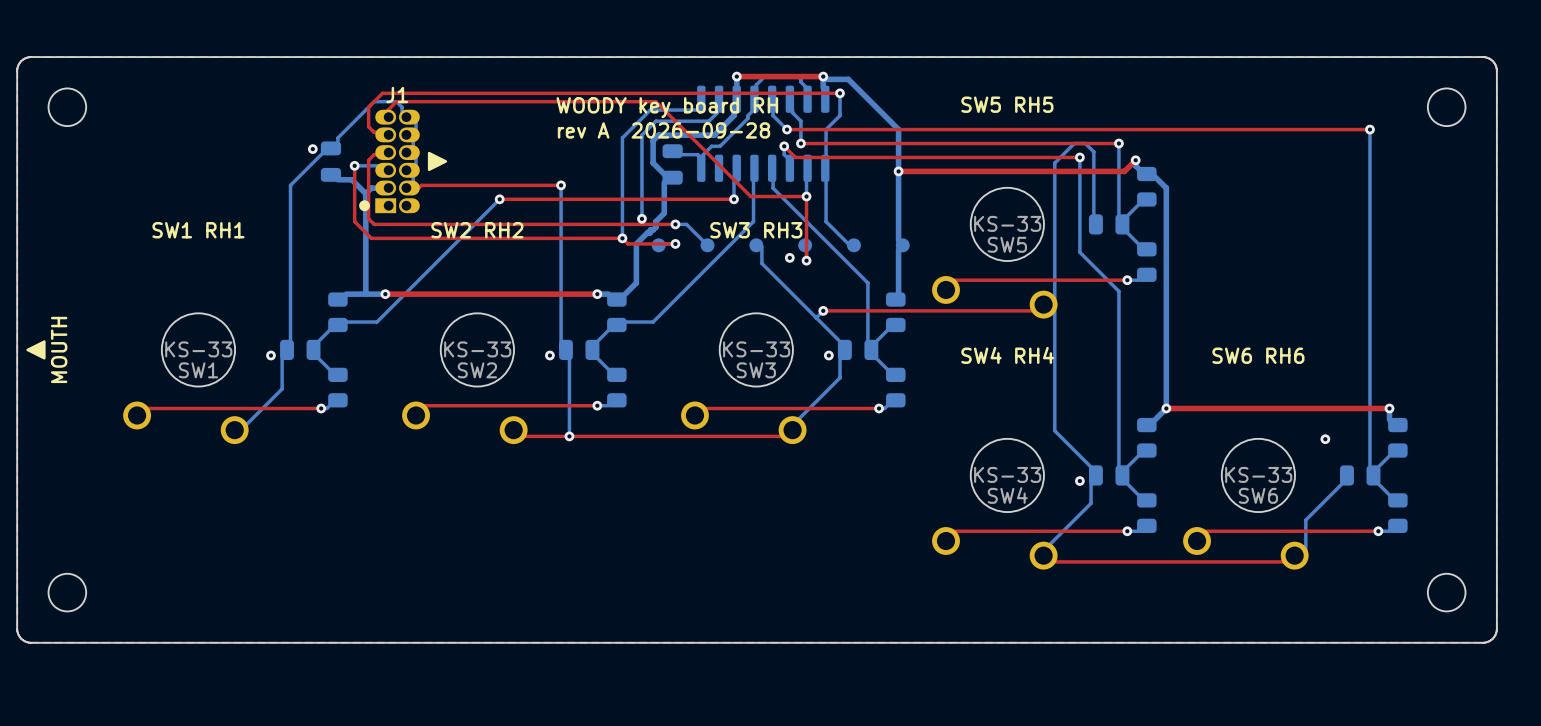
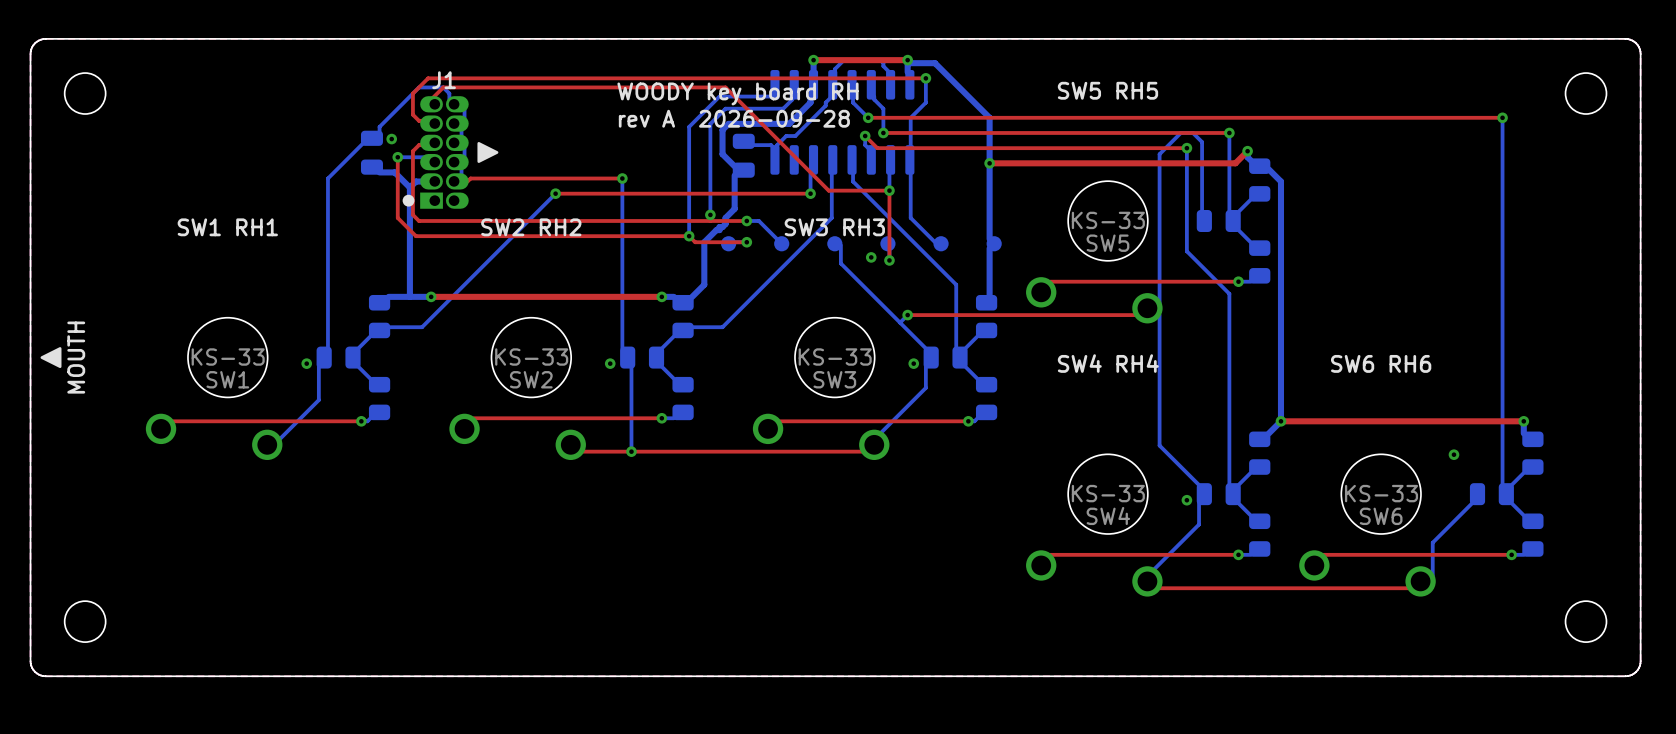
via position: (312, 149) -> (391, 139)

